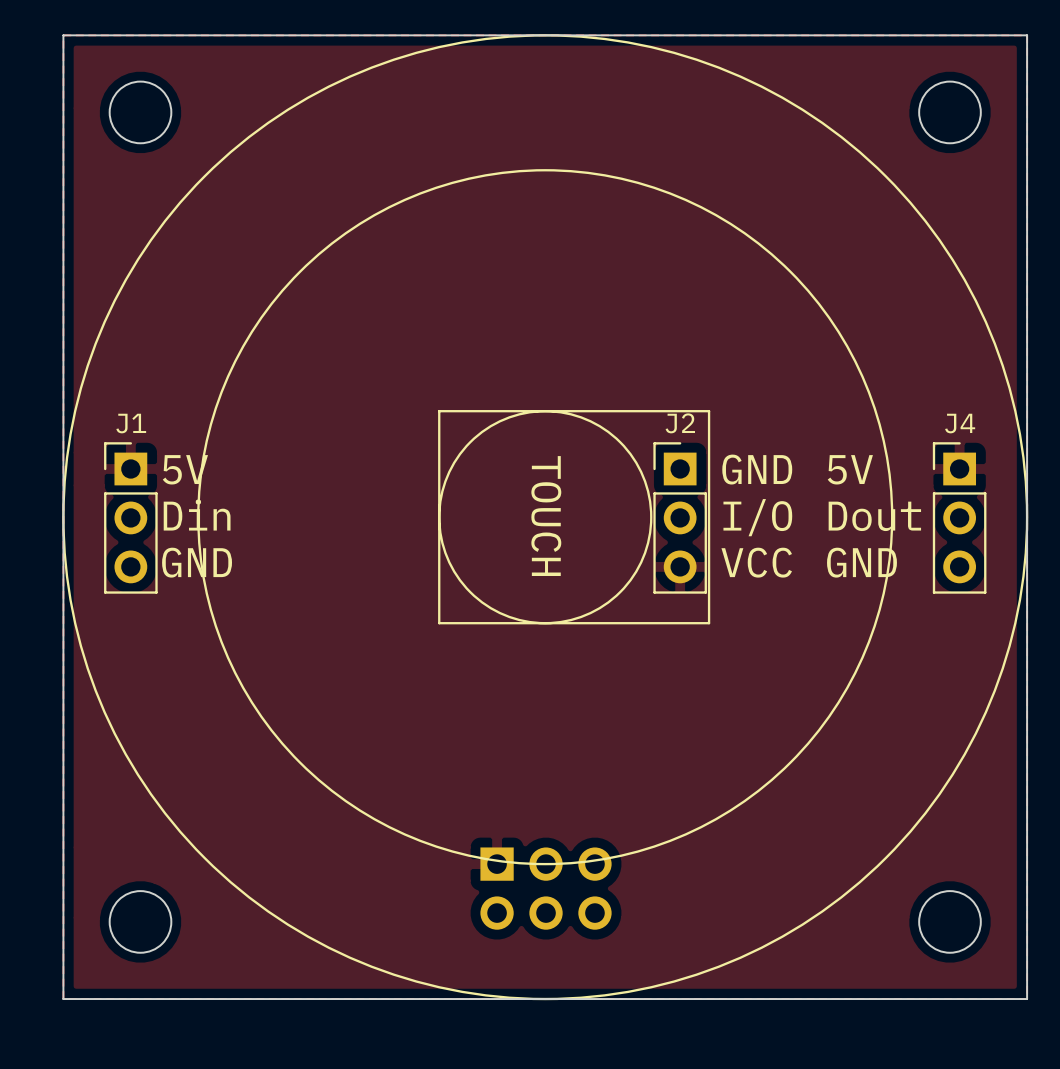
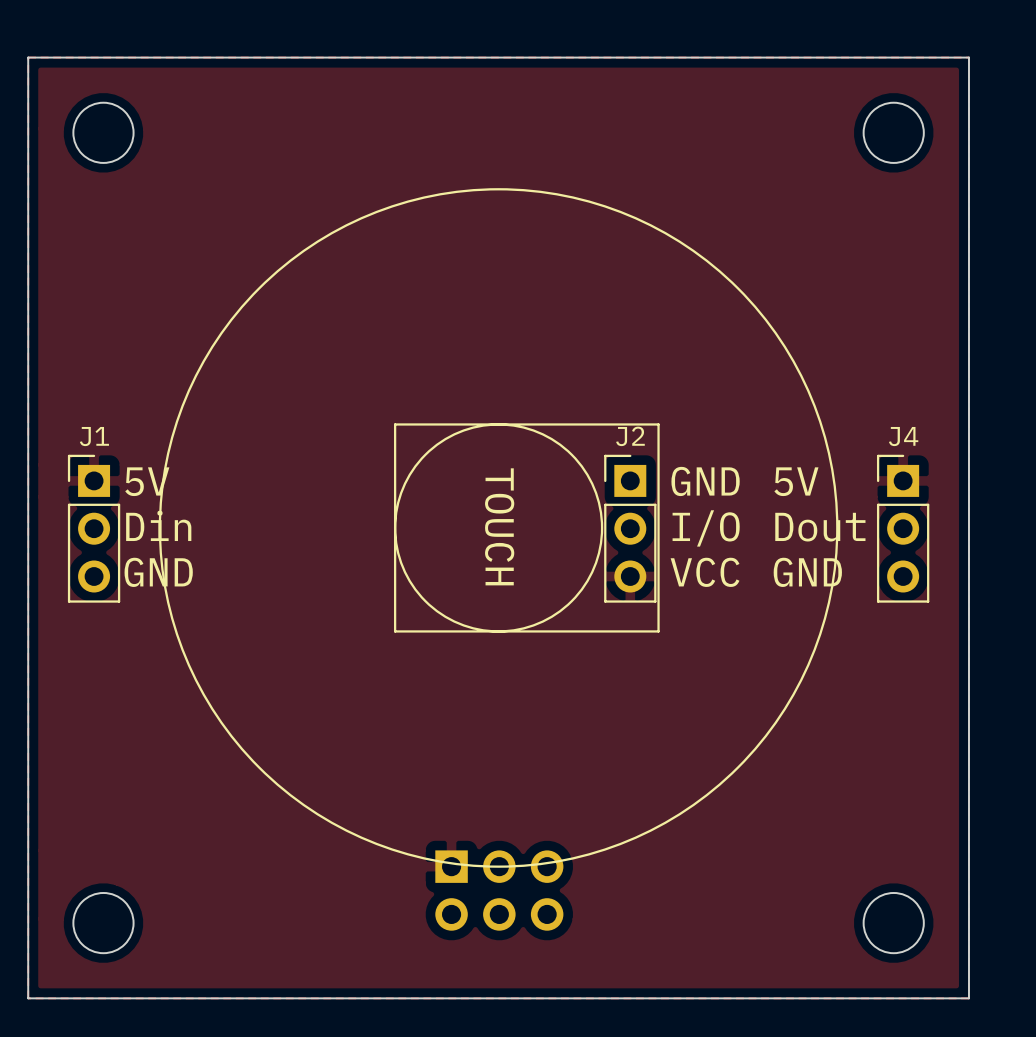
drawing: [62, 34, 1029, 1001] -> none

